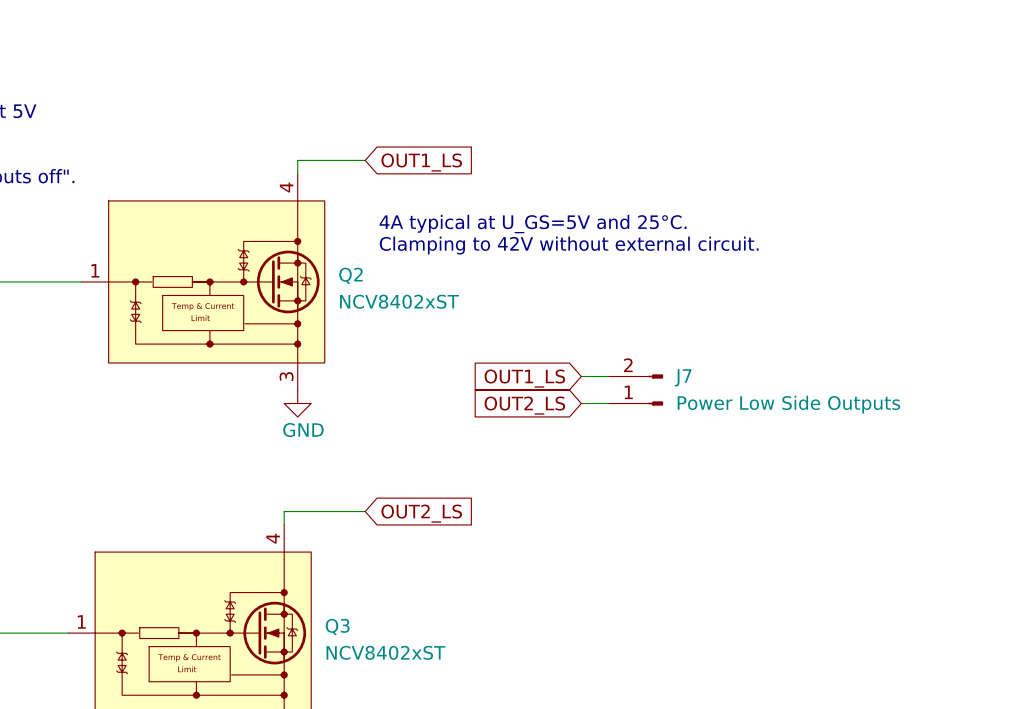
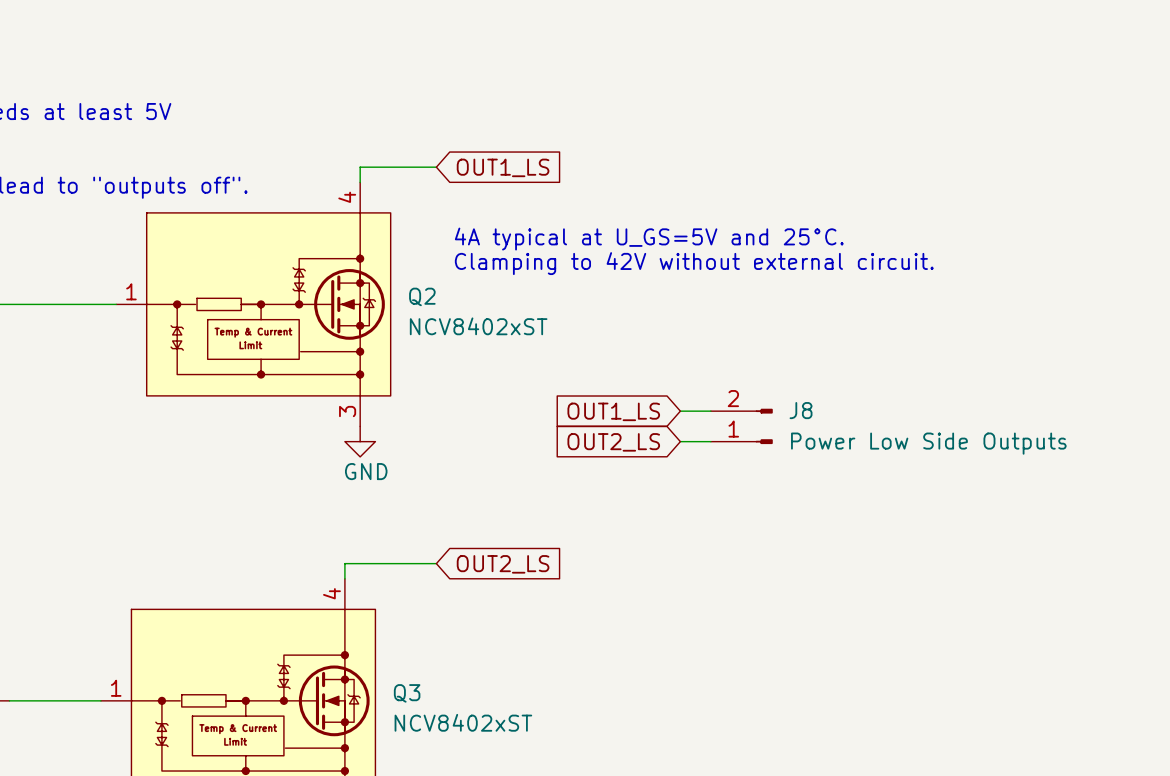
J7 name: J7 (683, 377) -> J8 (801, 410)

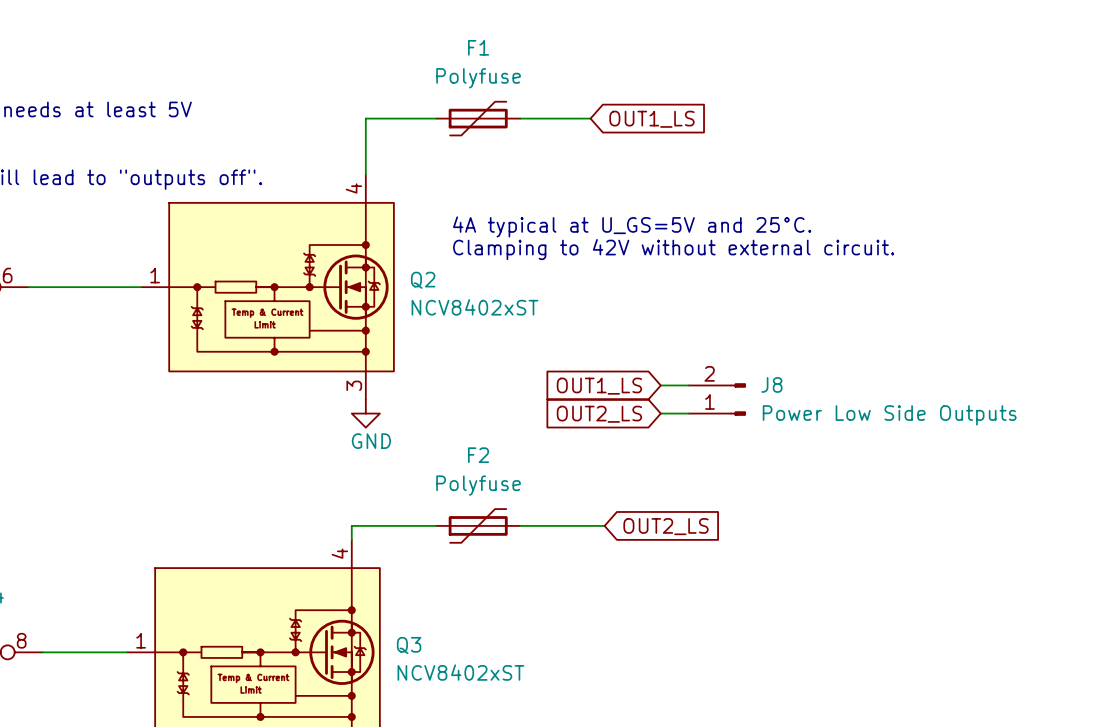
F1: none -> Polyfuse (478, 118)
wire: none -> (520, 118) (590, 118)
wire: (360, 167) (436, 167) -> (365, 160) (365, 118) (436, 118)
global label position: OUT1_LS (503, 167) -> OUT1_LS (651, 119)
F2: none -> Polyfuse (478, 525)
wire: none -> (520, 525) (604, 525)
global label position: OUT2_LS (503, 564) -> OUT2_LS (666, 526)

